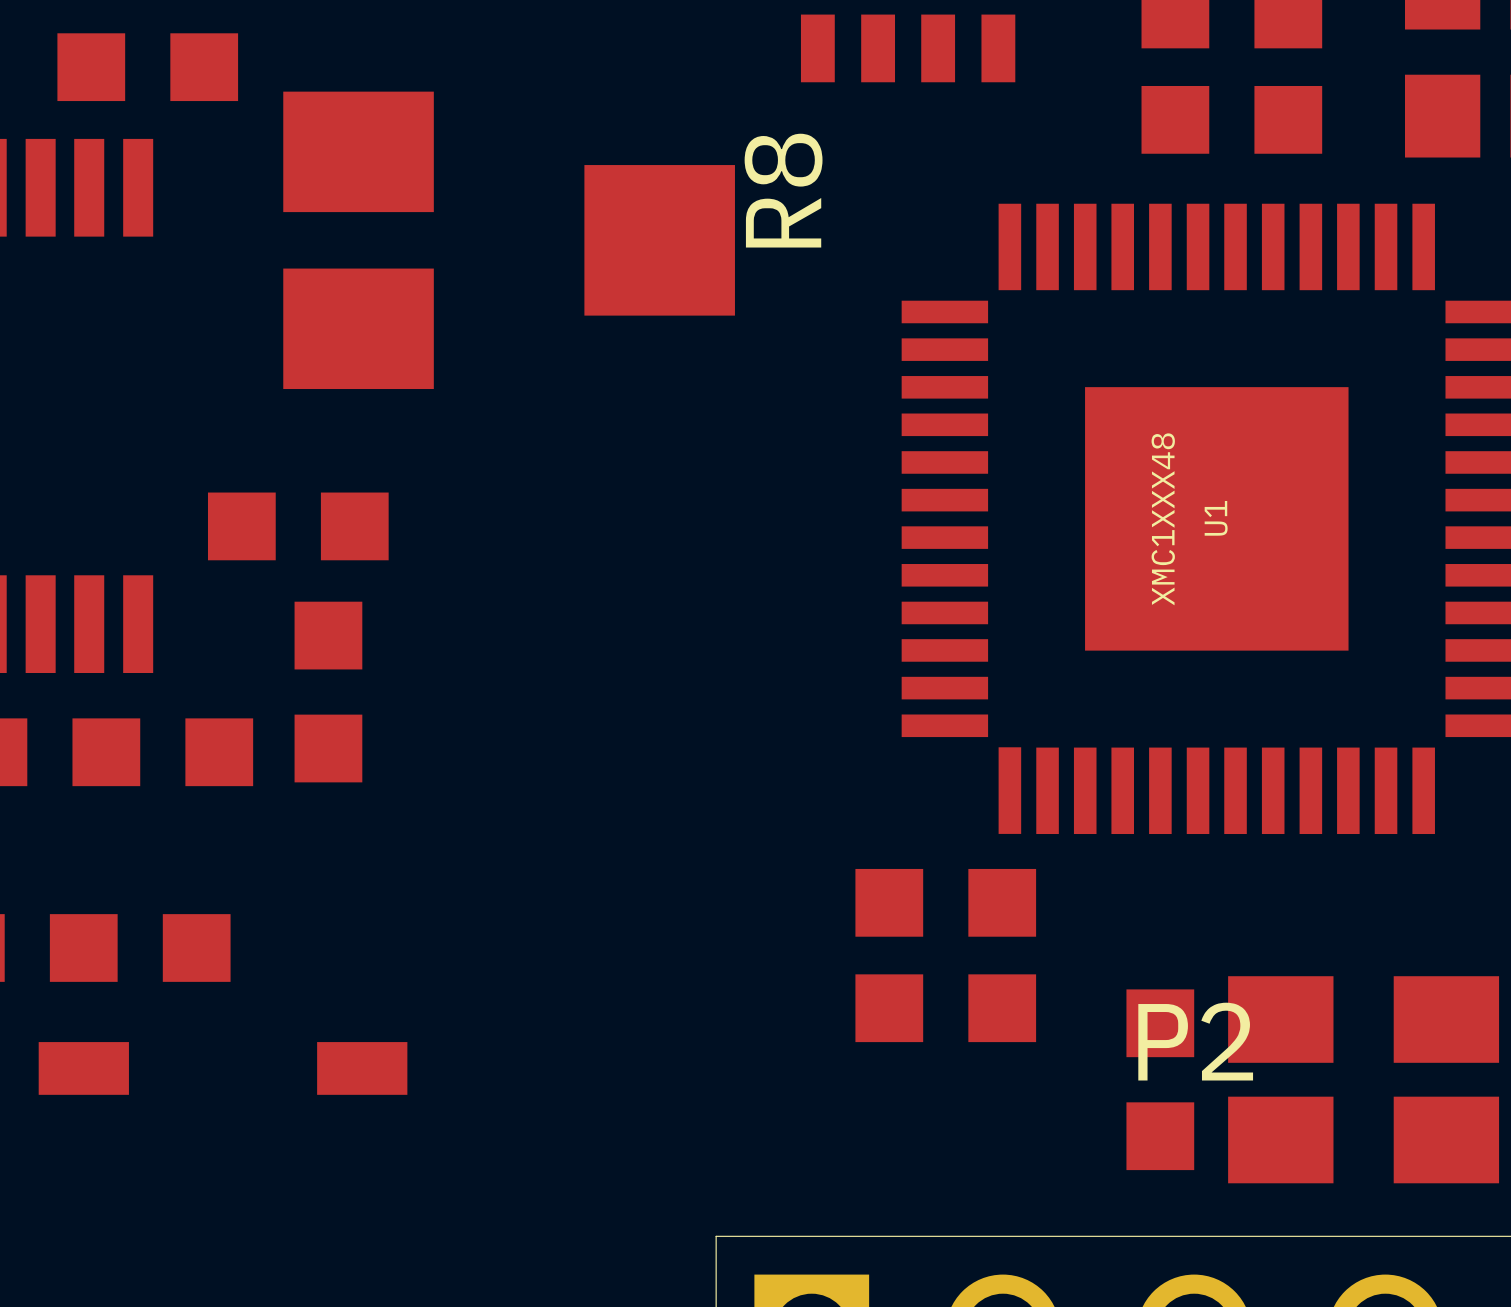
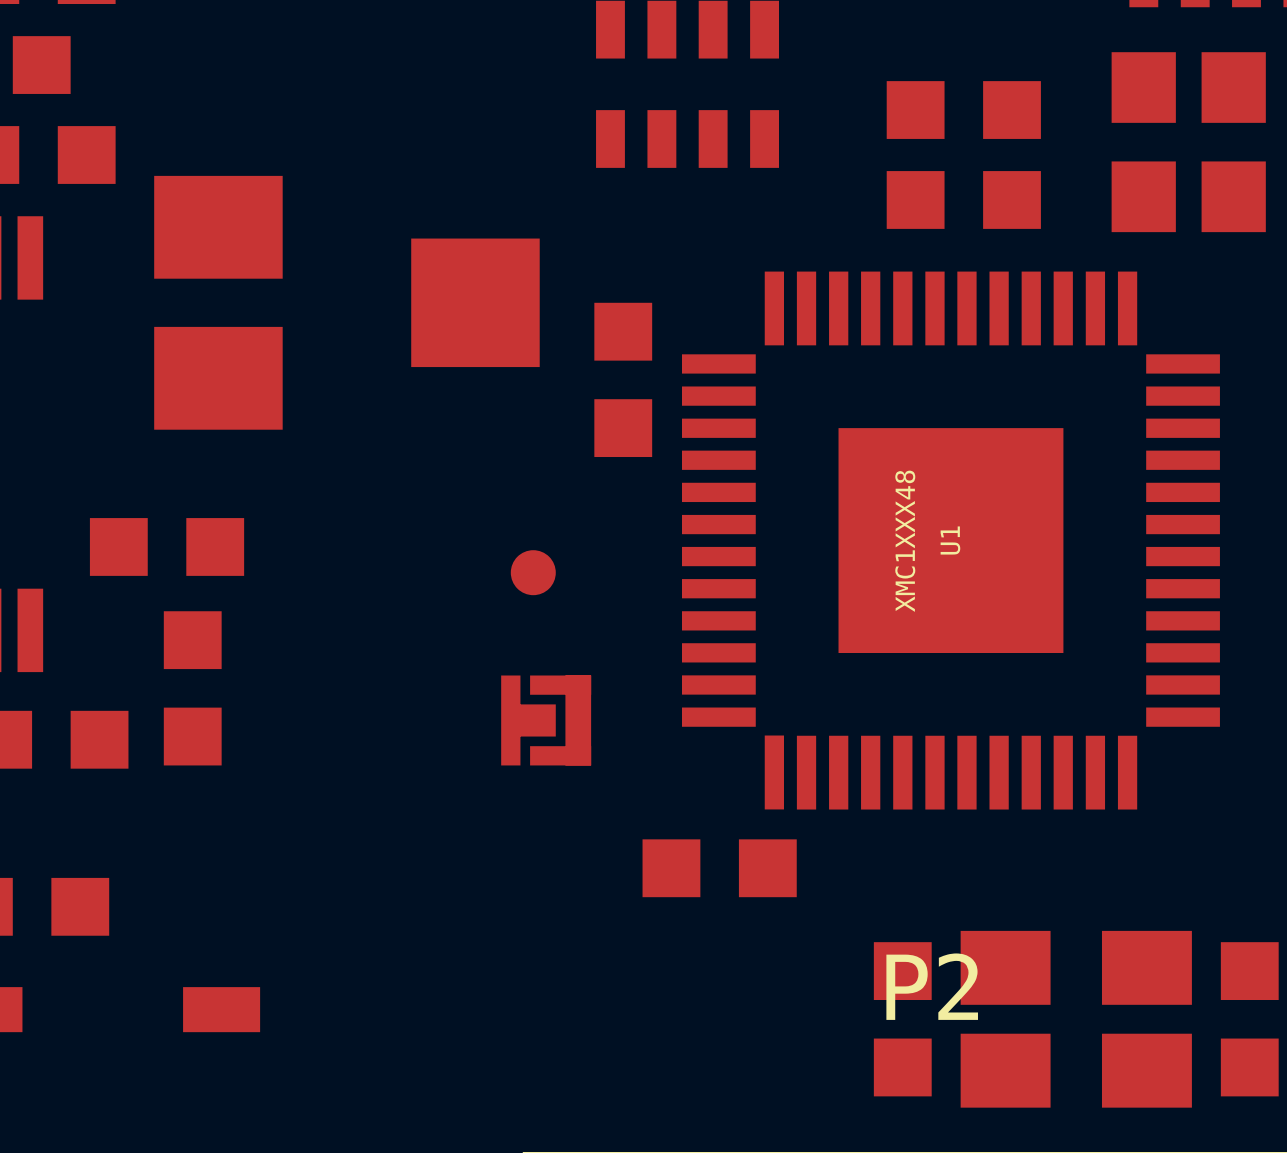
R8 name: R8 (783, 190) -> none
part: none -> (533, 572)
part: none -> (546, 720)
part rotation: 0° (945, 1008) -> 90° clockwise (623, 379)
part position: (945, 1008) -> (623, 379)

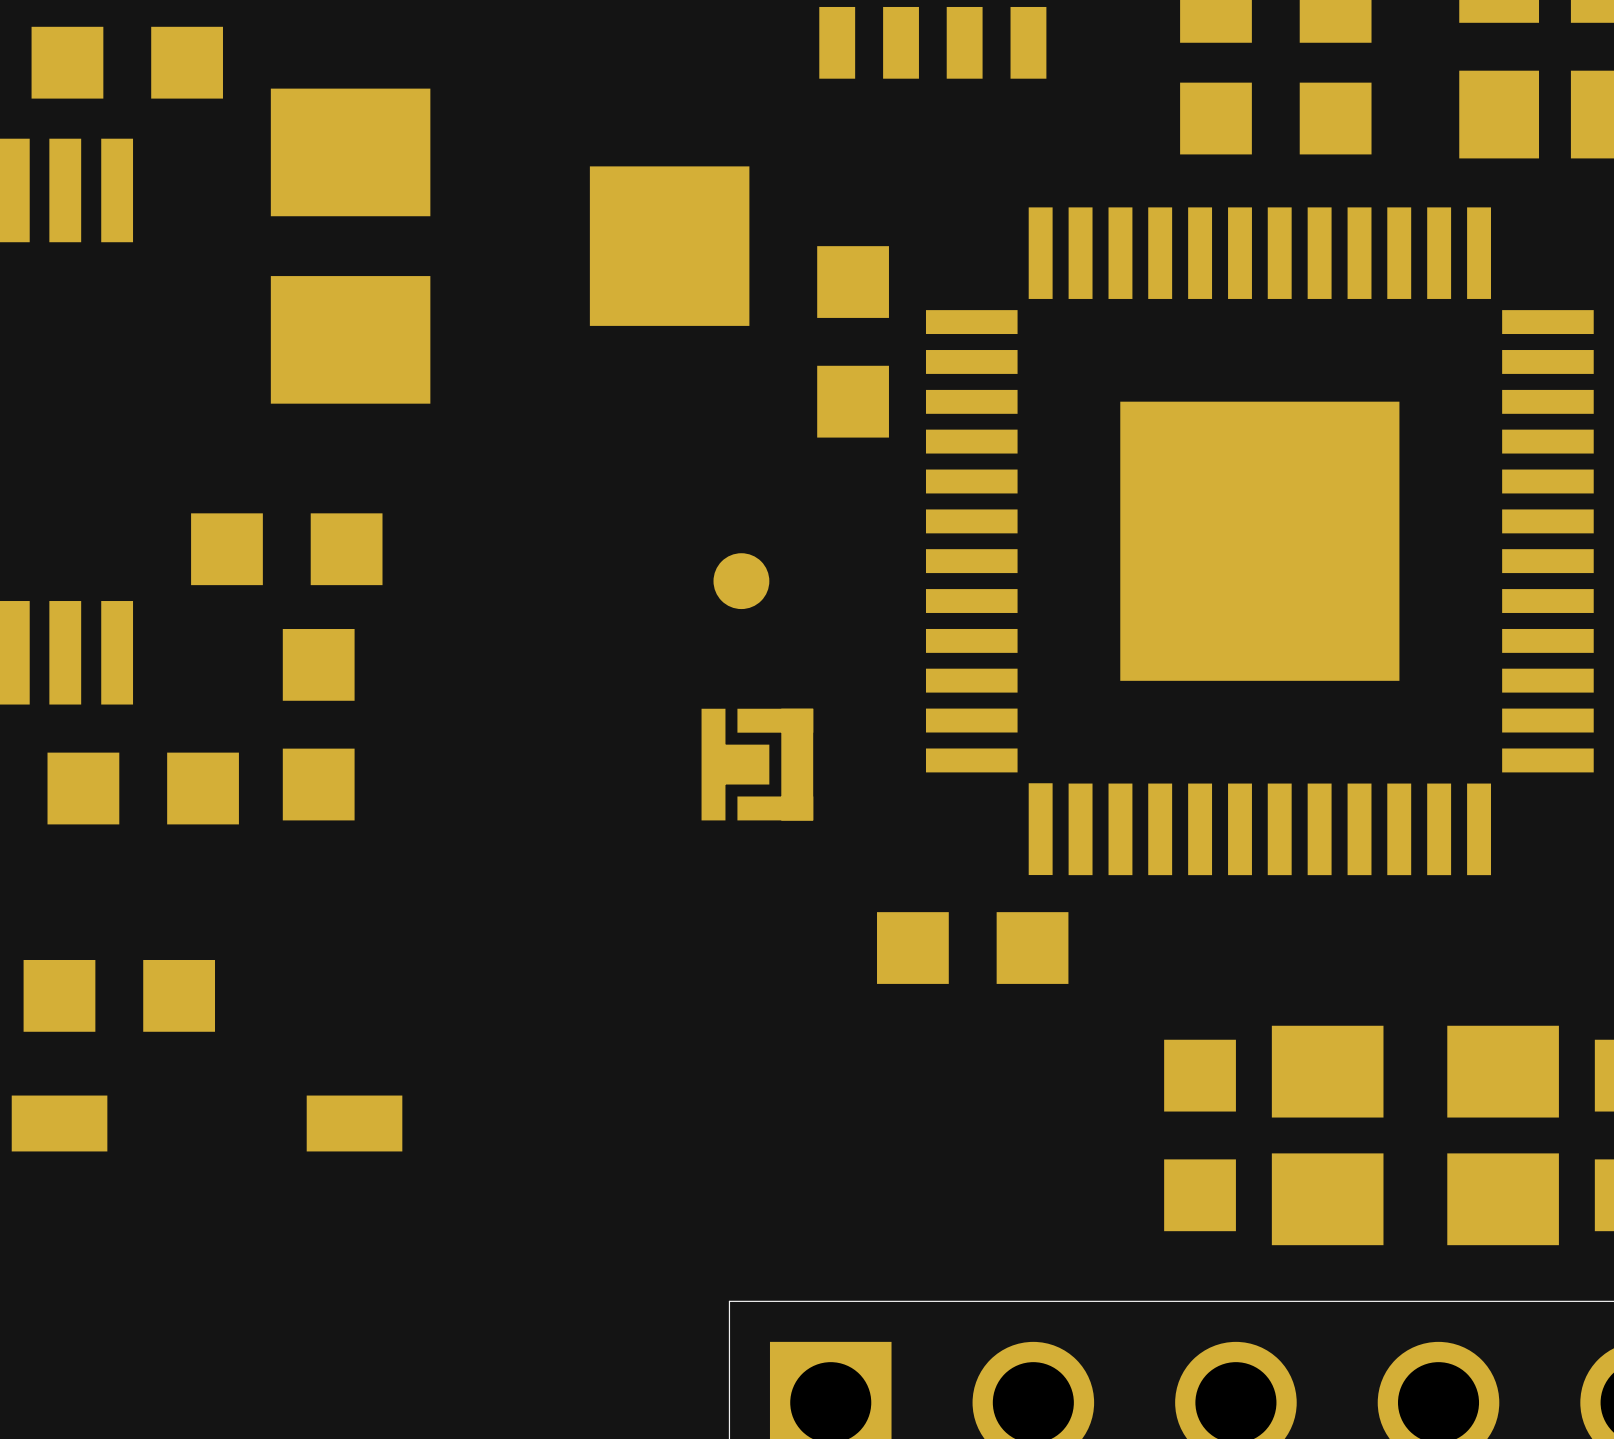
U1 name: U1 (950, 540) -> none
U1 value: XMC1XXX48 (905, 541) -> none
P2 name: P2 (932, 986) -> none

